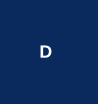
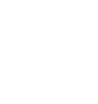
text: D (46, 51) -> none

